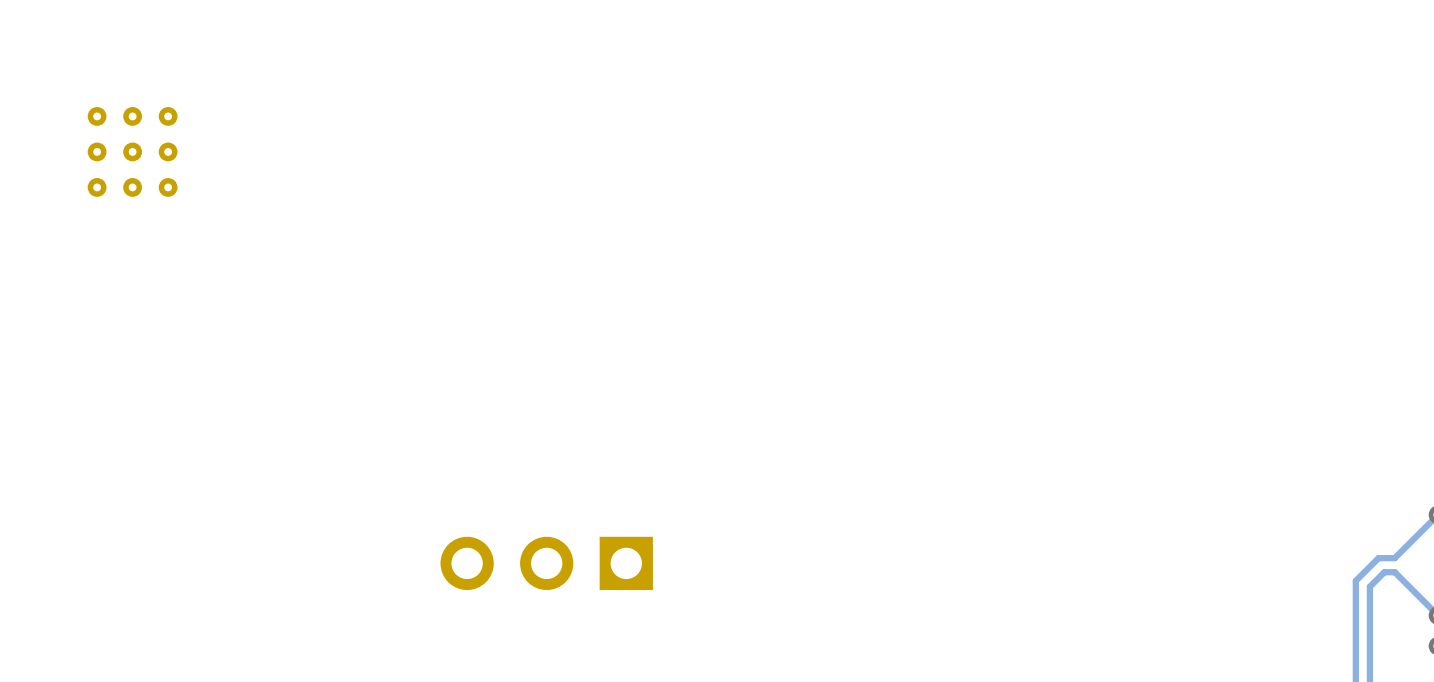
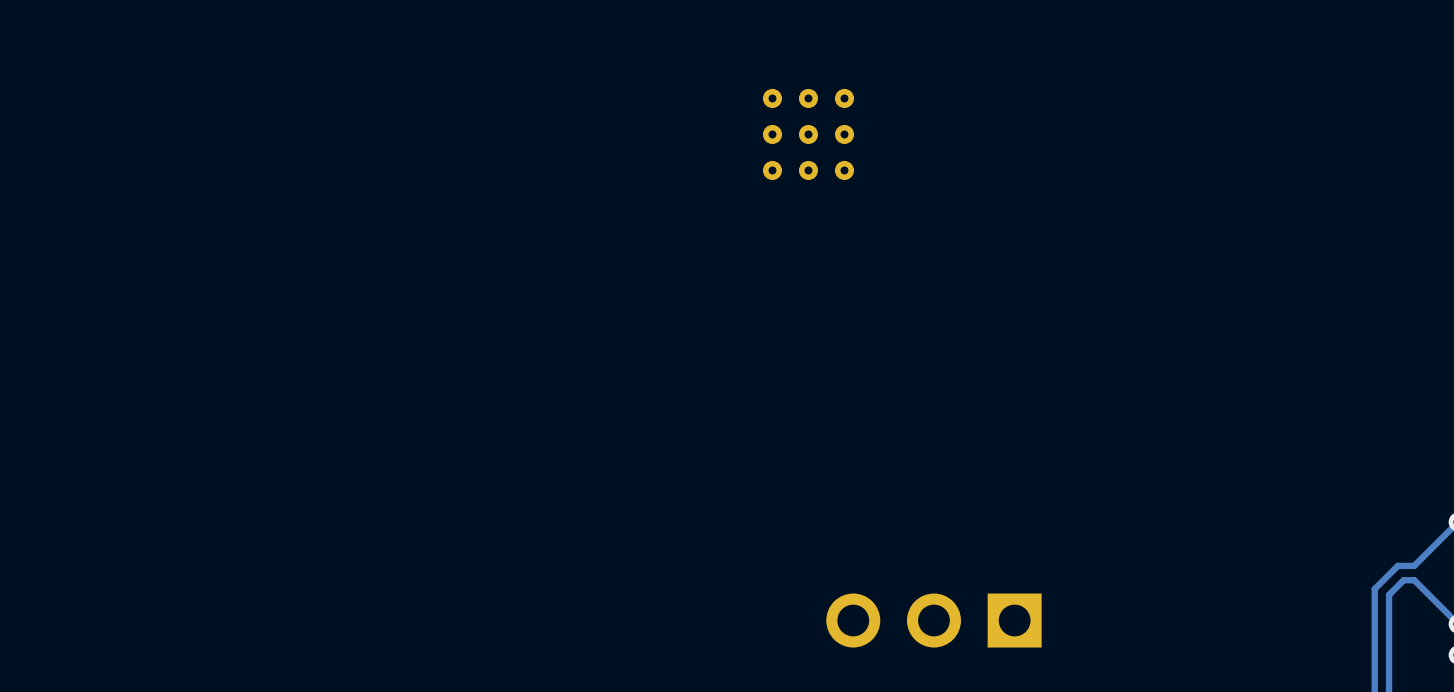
part position: (132, 151) -> (808, 134)
part position: (546, 563) -> (933, 620)

